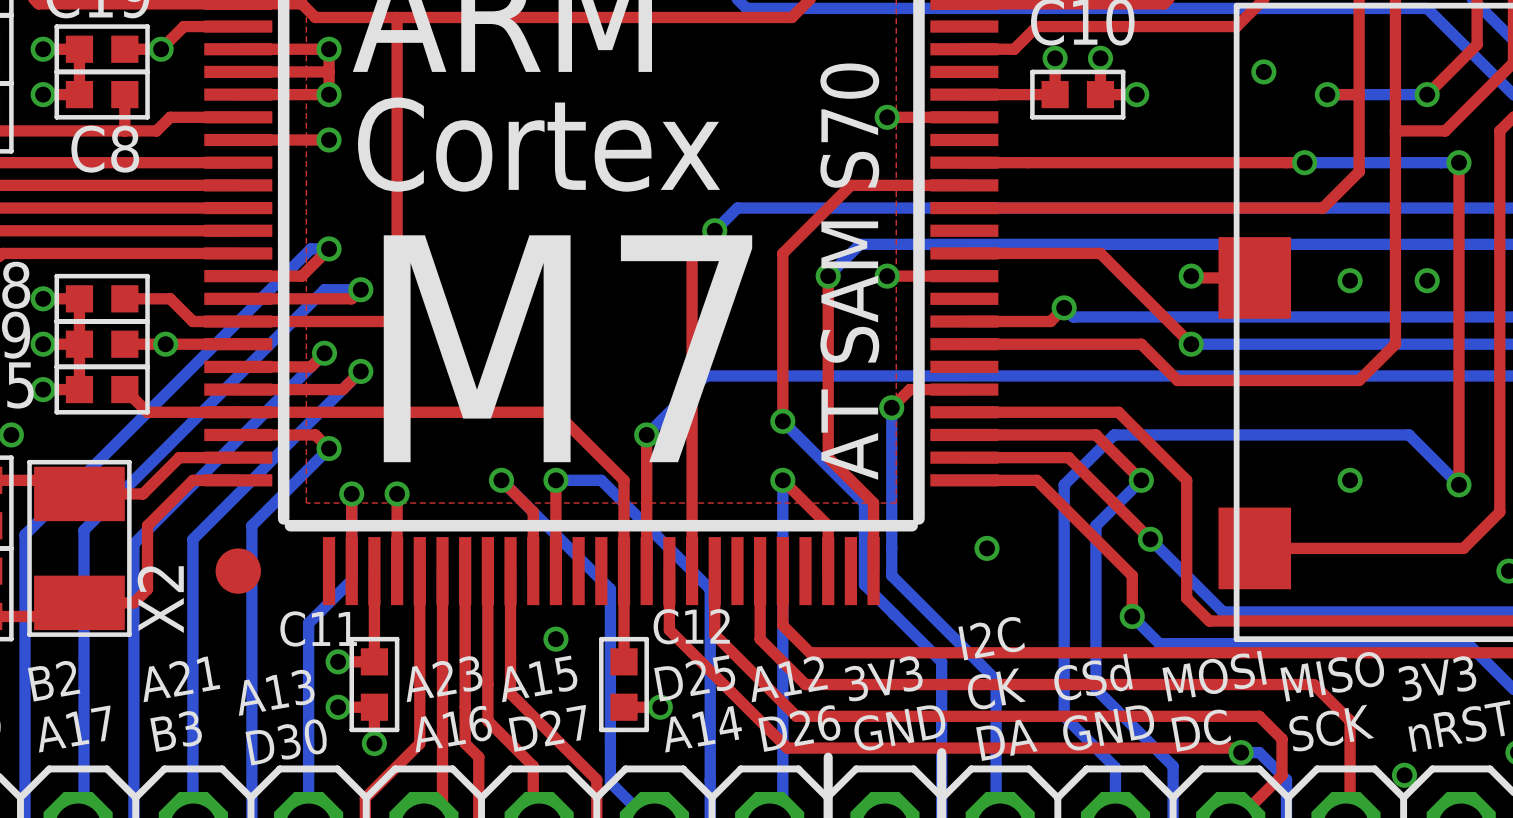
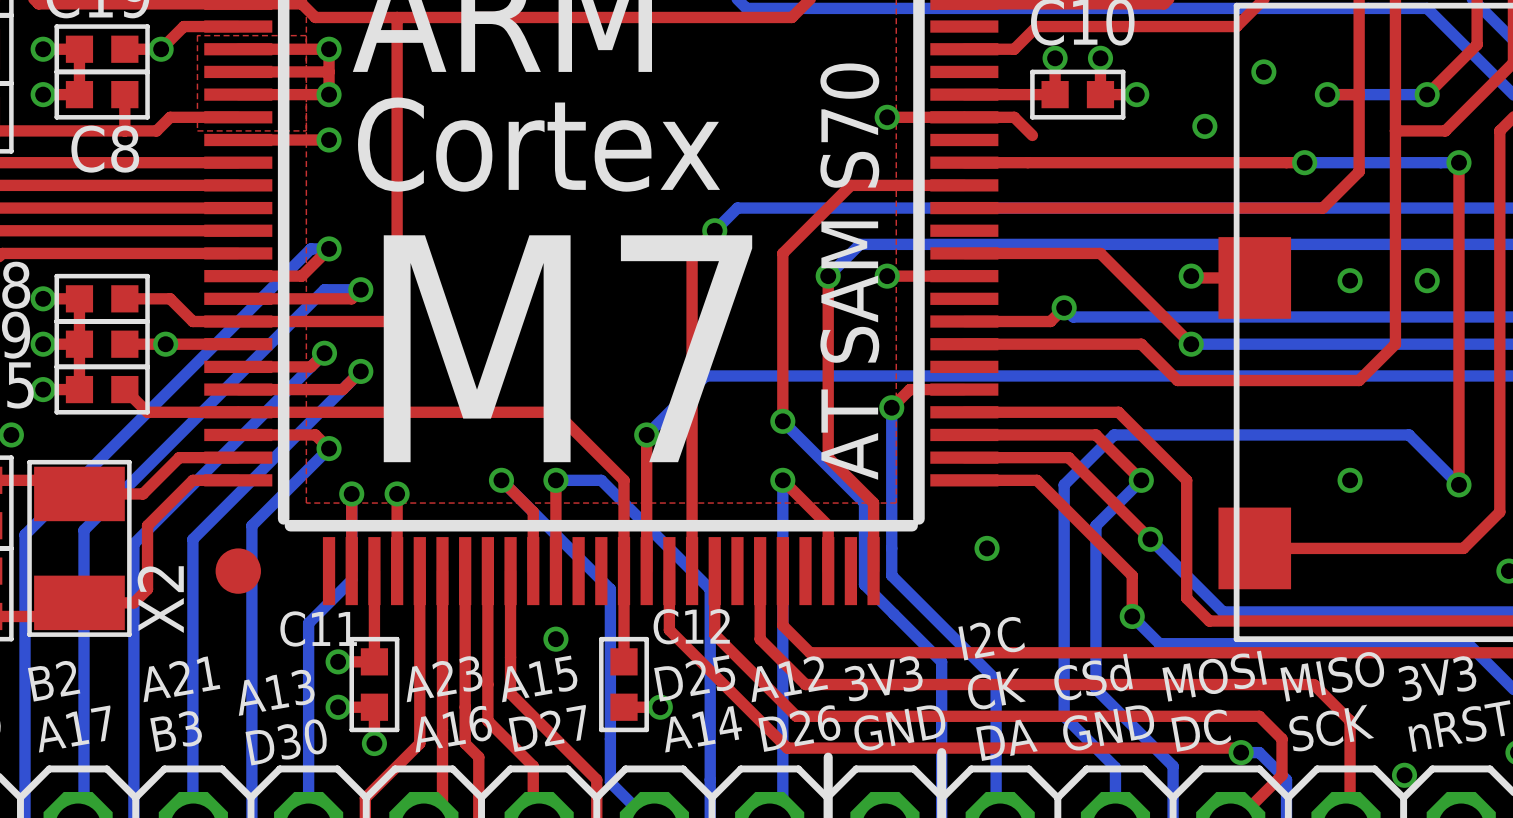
top zone outline: none -> (306, 35) (197, 35) (197, 130) (306, 130)
top track: none -> (964, 117) (1014, 117) (1032, 135)
via: none -> (1204, 126)

